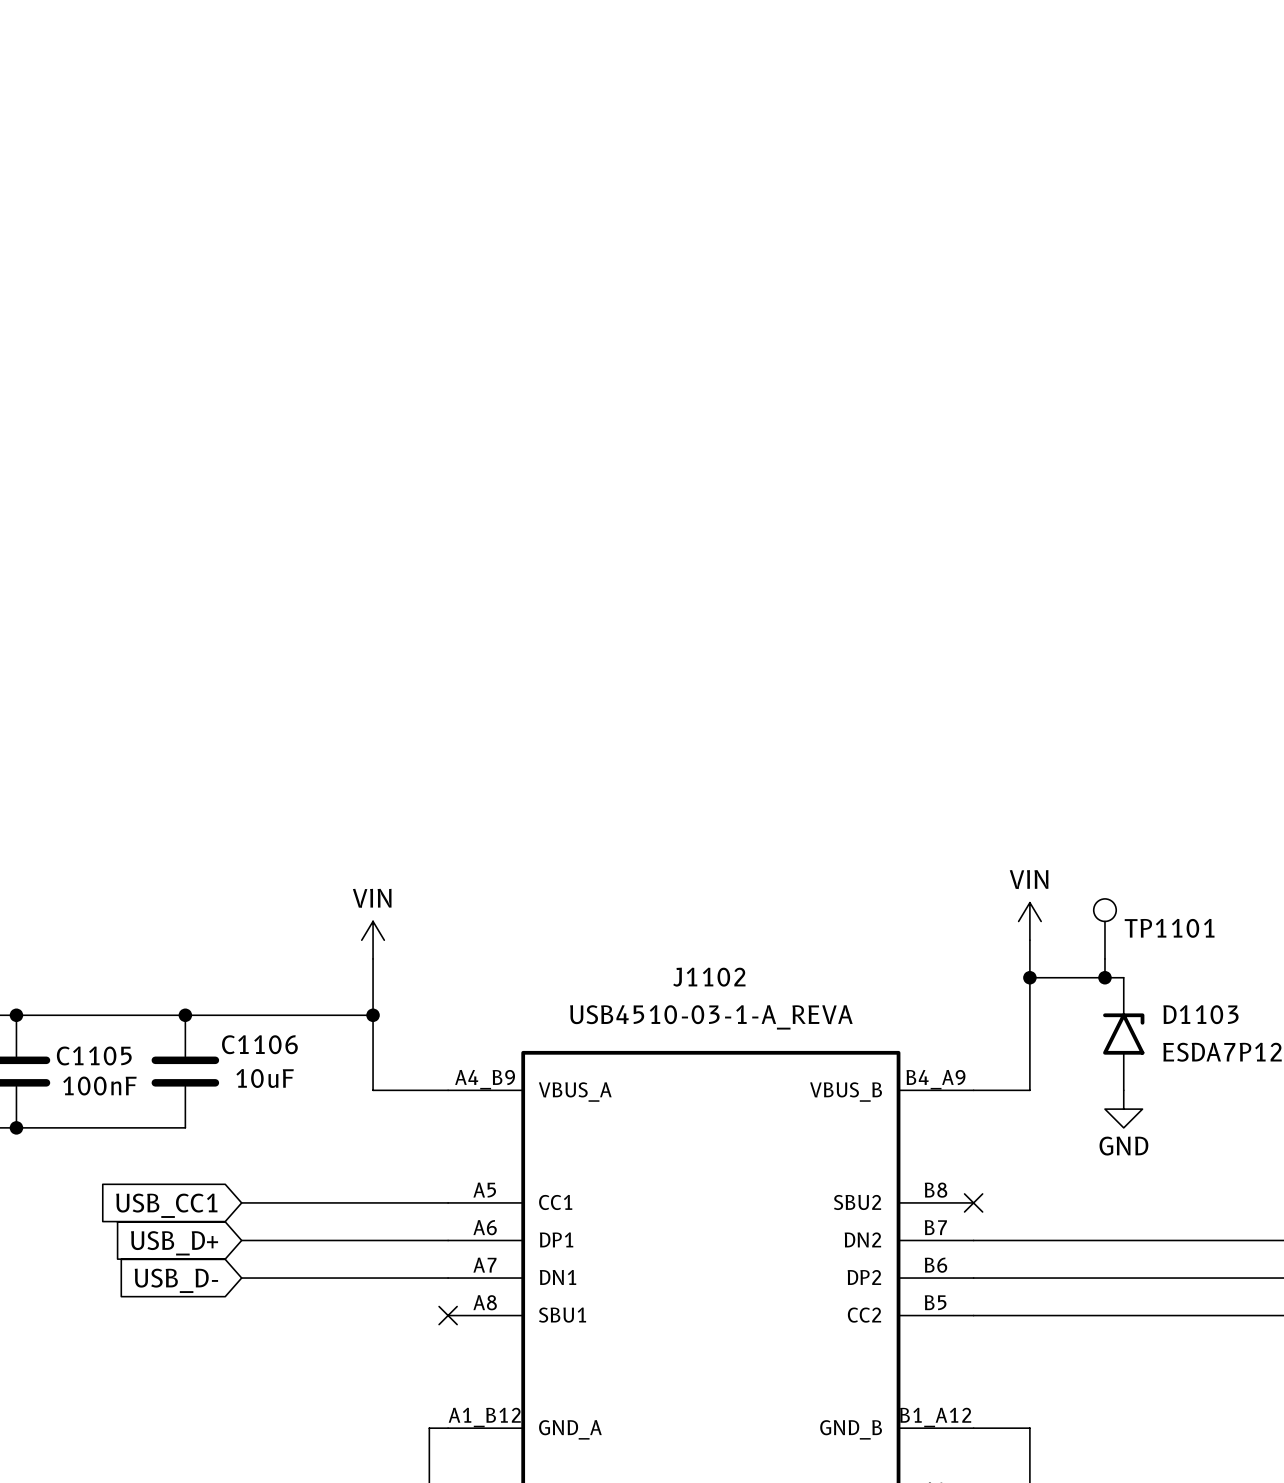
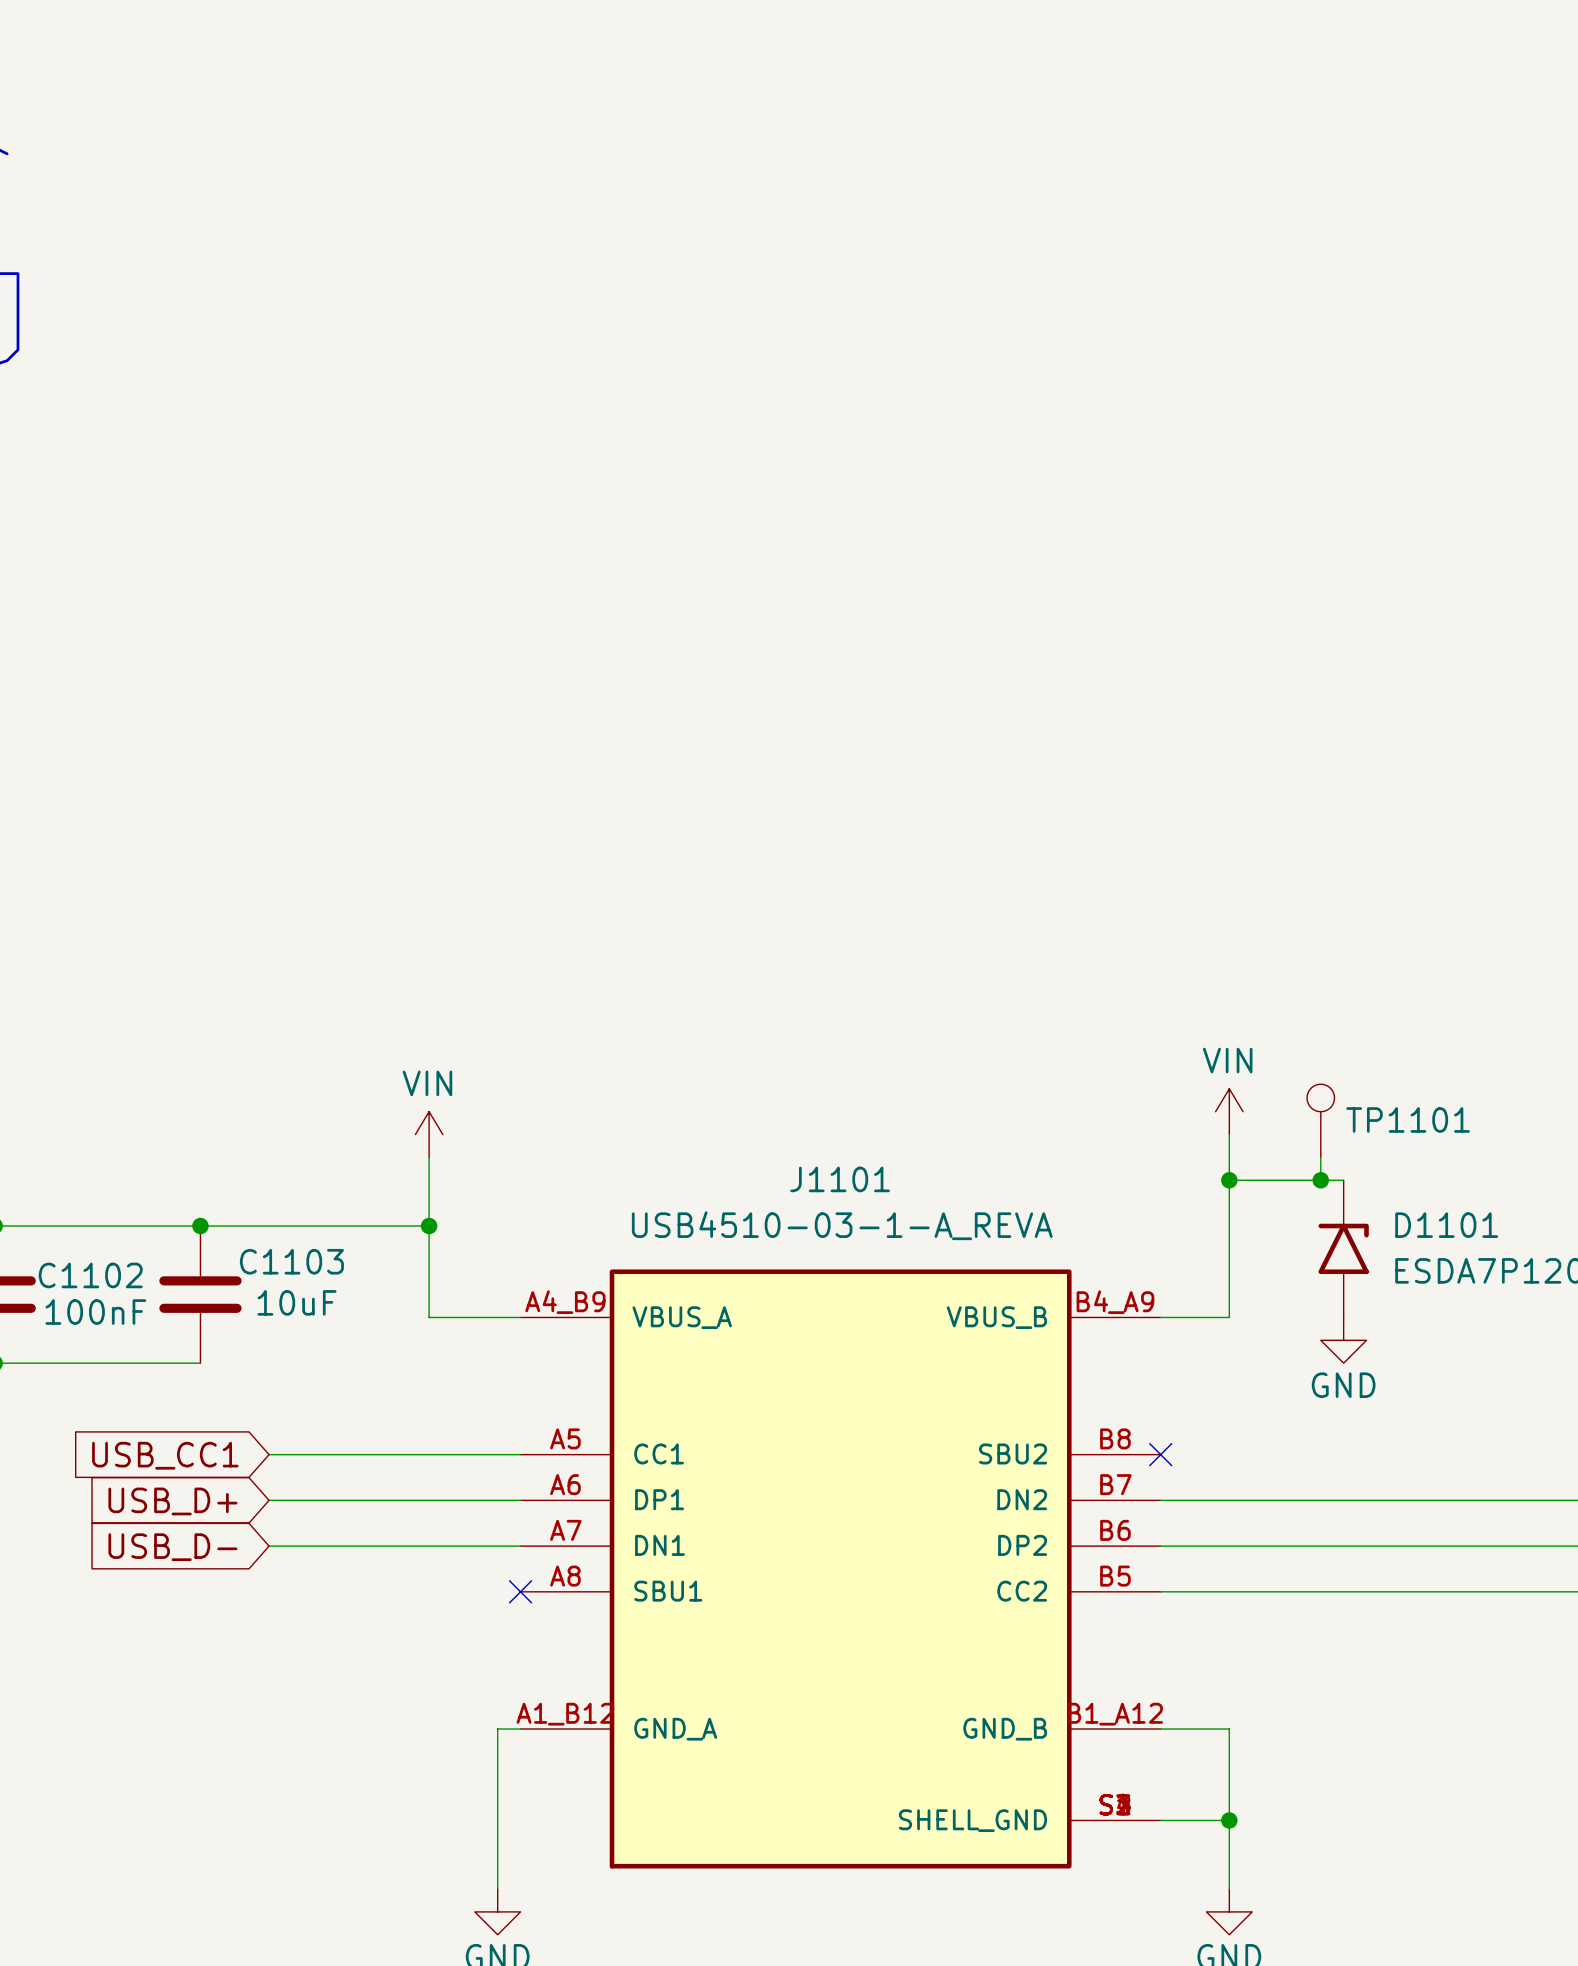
J1102 name: J1102 (709, 977) -> J1101 (840, 1179)
D1103 name: D1103 (1200, 1014) -> D1101 (1446, 1225)
C1106 name: C1106 (259, 1044) -> C1103 (291, 1261)
C1105 name: C1105 (94, 1055) -> C1102 (90, 1275)

